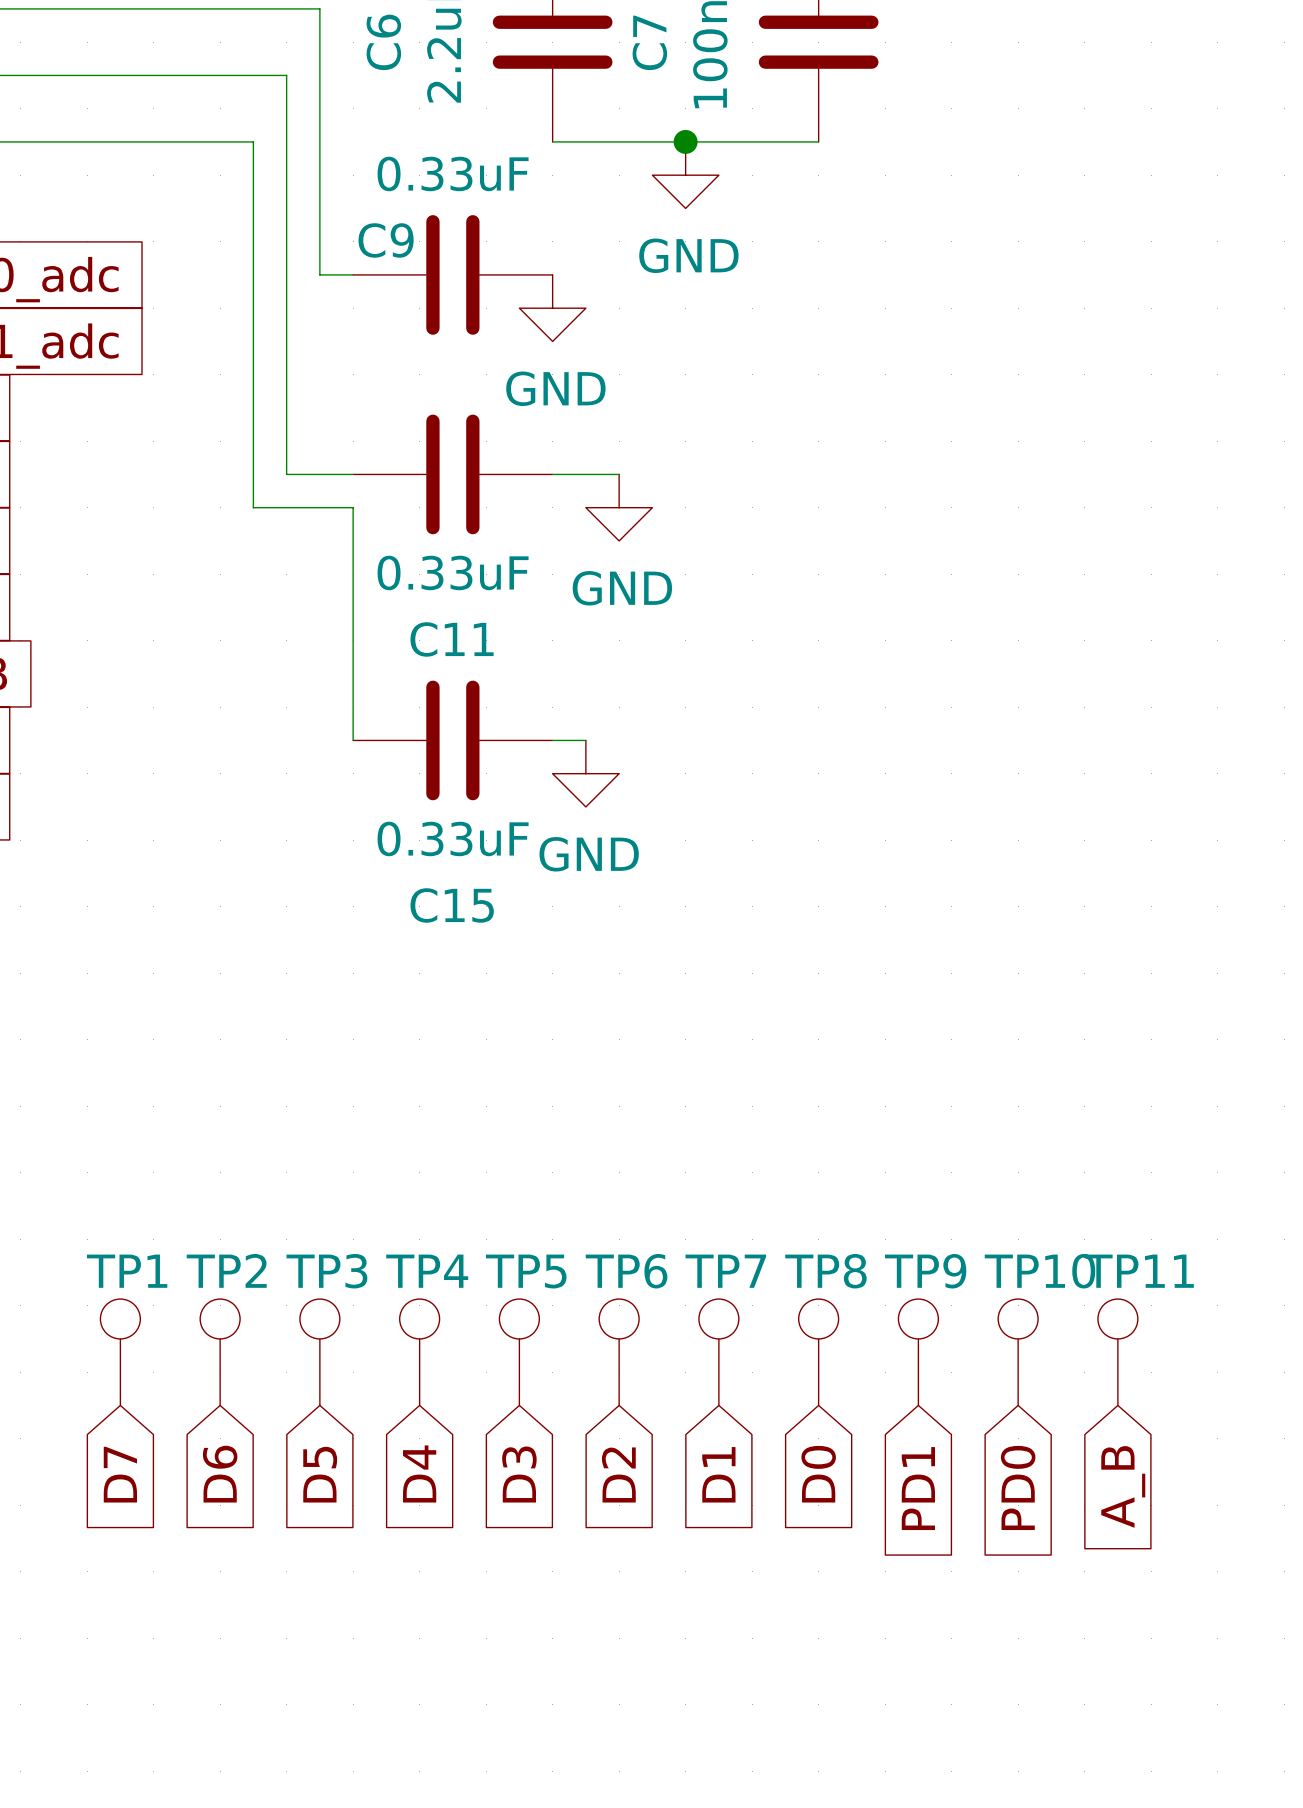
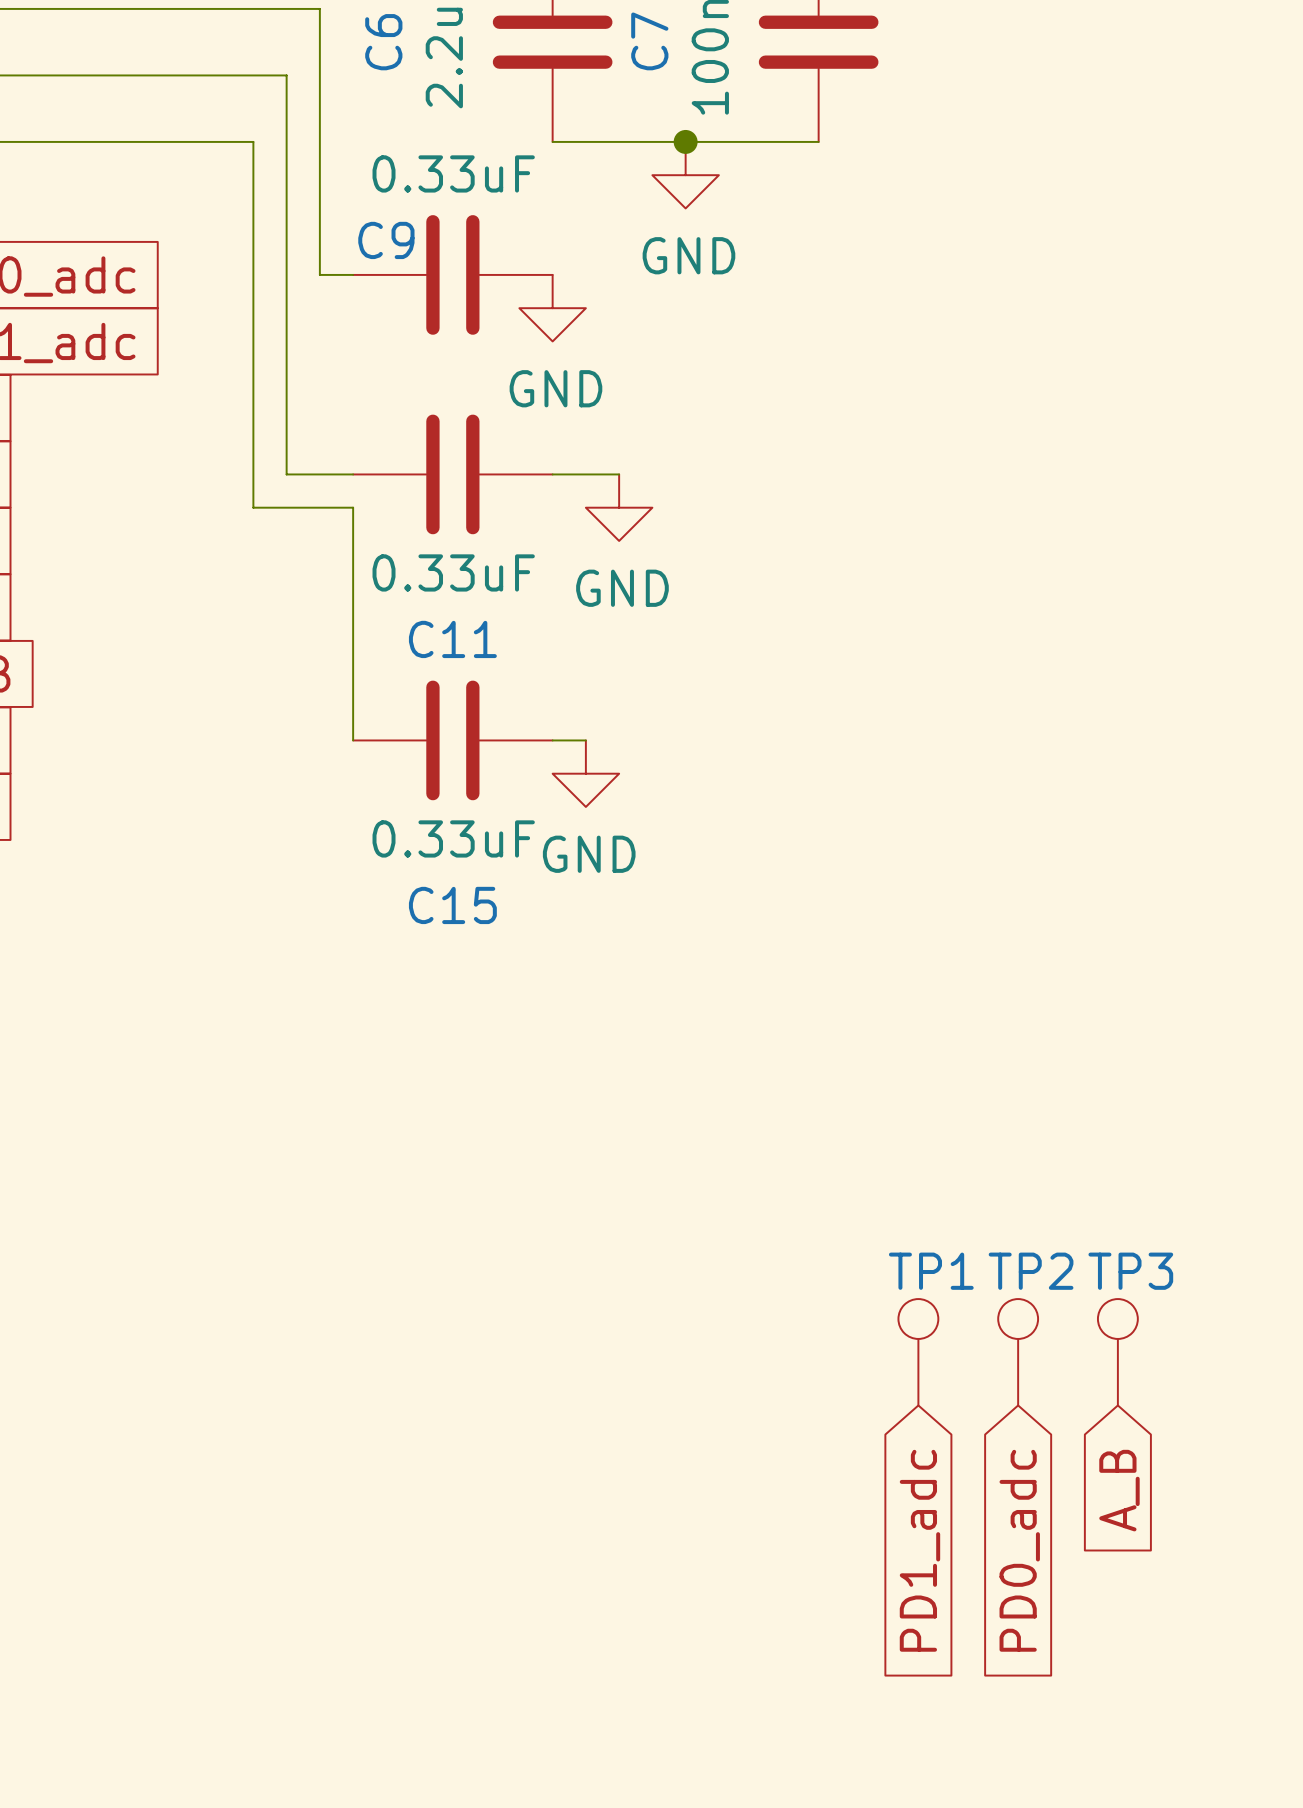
TP9 name: TP9 (925, 1271) -> TP1 (931, 1271)
TP10 name: TP10 (1040, 1271) -> TP2 (1031, 1271)
TP11 name: TP11 (1139, 1271) -> TP3 (1130, 1271)
TP1: (120, 1352) -> none
TP2: (220, 1352) -> none
TP3: (319, 1352) -> none
TP4: (419, 1352) -> none
TP5: (519, 1352) -> none
TP6: (619, 1352) -> none
TP7: (718, 1352) -> none
TP8: (818, 1352) -> none
global label: D4 (419, 1473) -> none
global label: D7 (120, 1474) -> none
global label: D6 (220, 1474) -> none
global label: D5 (320, 1474) -> none
global label: D3 (519, 1474) -> none
global label: D2 (618, 1474) -> none
global label: D1 (718, 1474) -> none
global label: D0 (818, 1474) -> none
global label: PD0 (1018, 1487) -> PD0_adc (1019, 1550)
global label: PD1 (918, 1488) -> PD1_adc (919, 1550)

